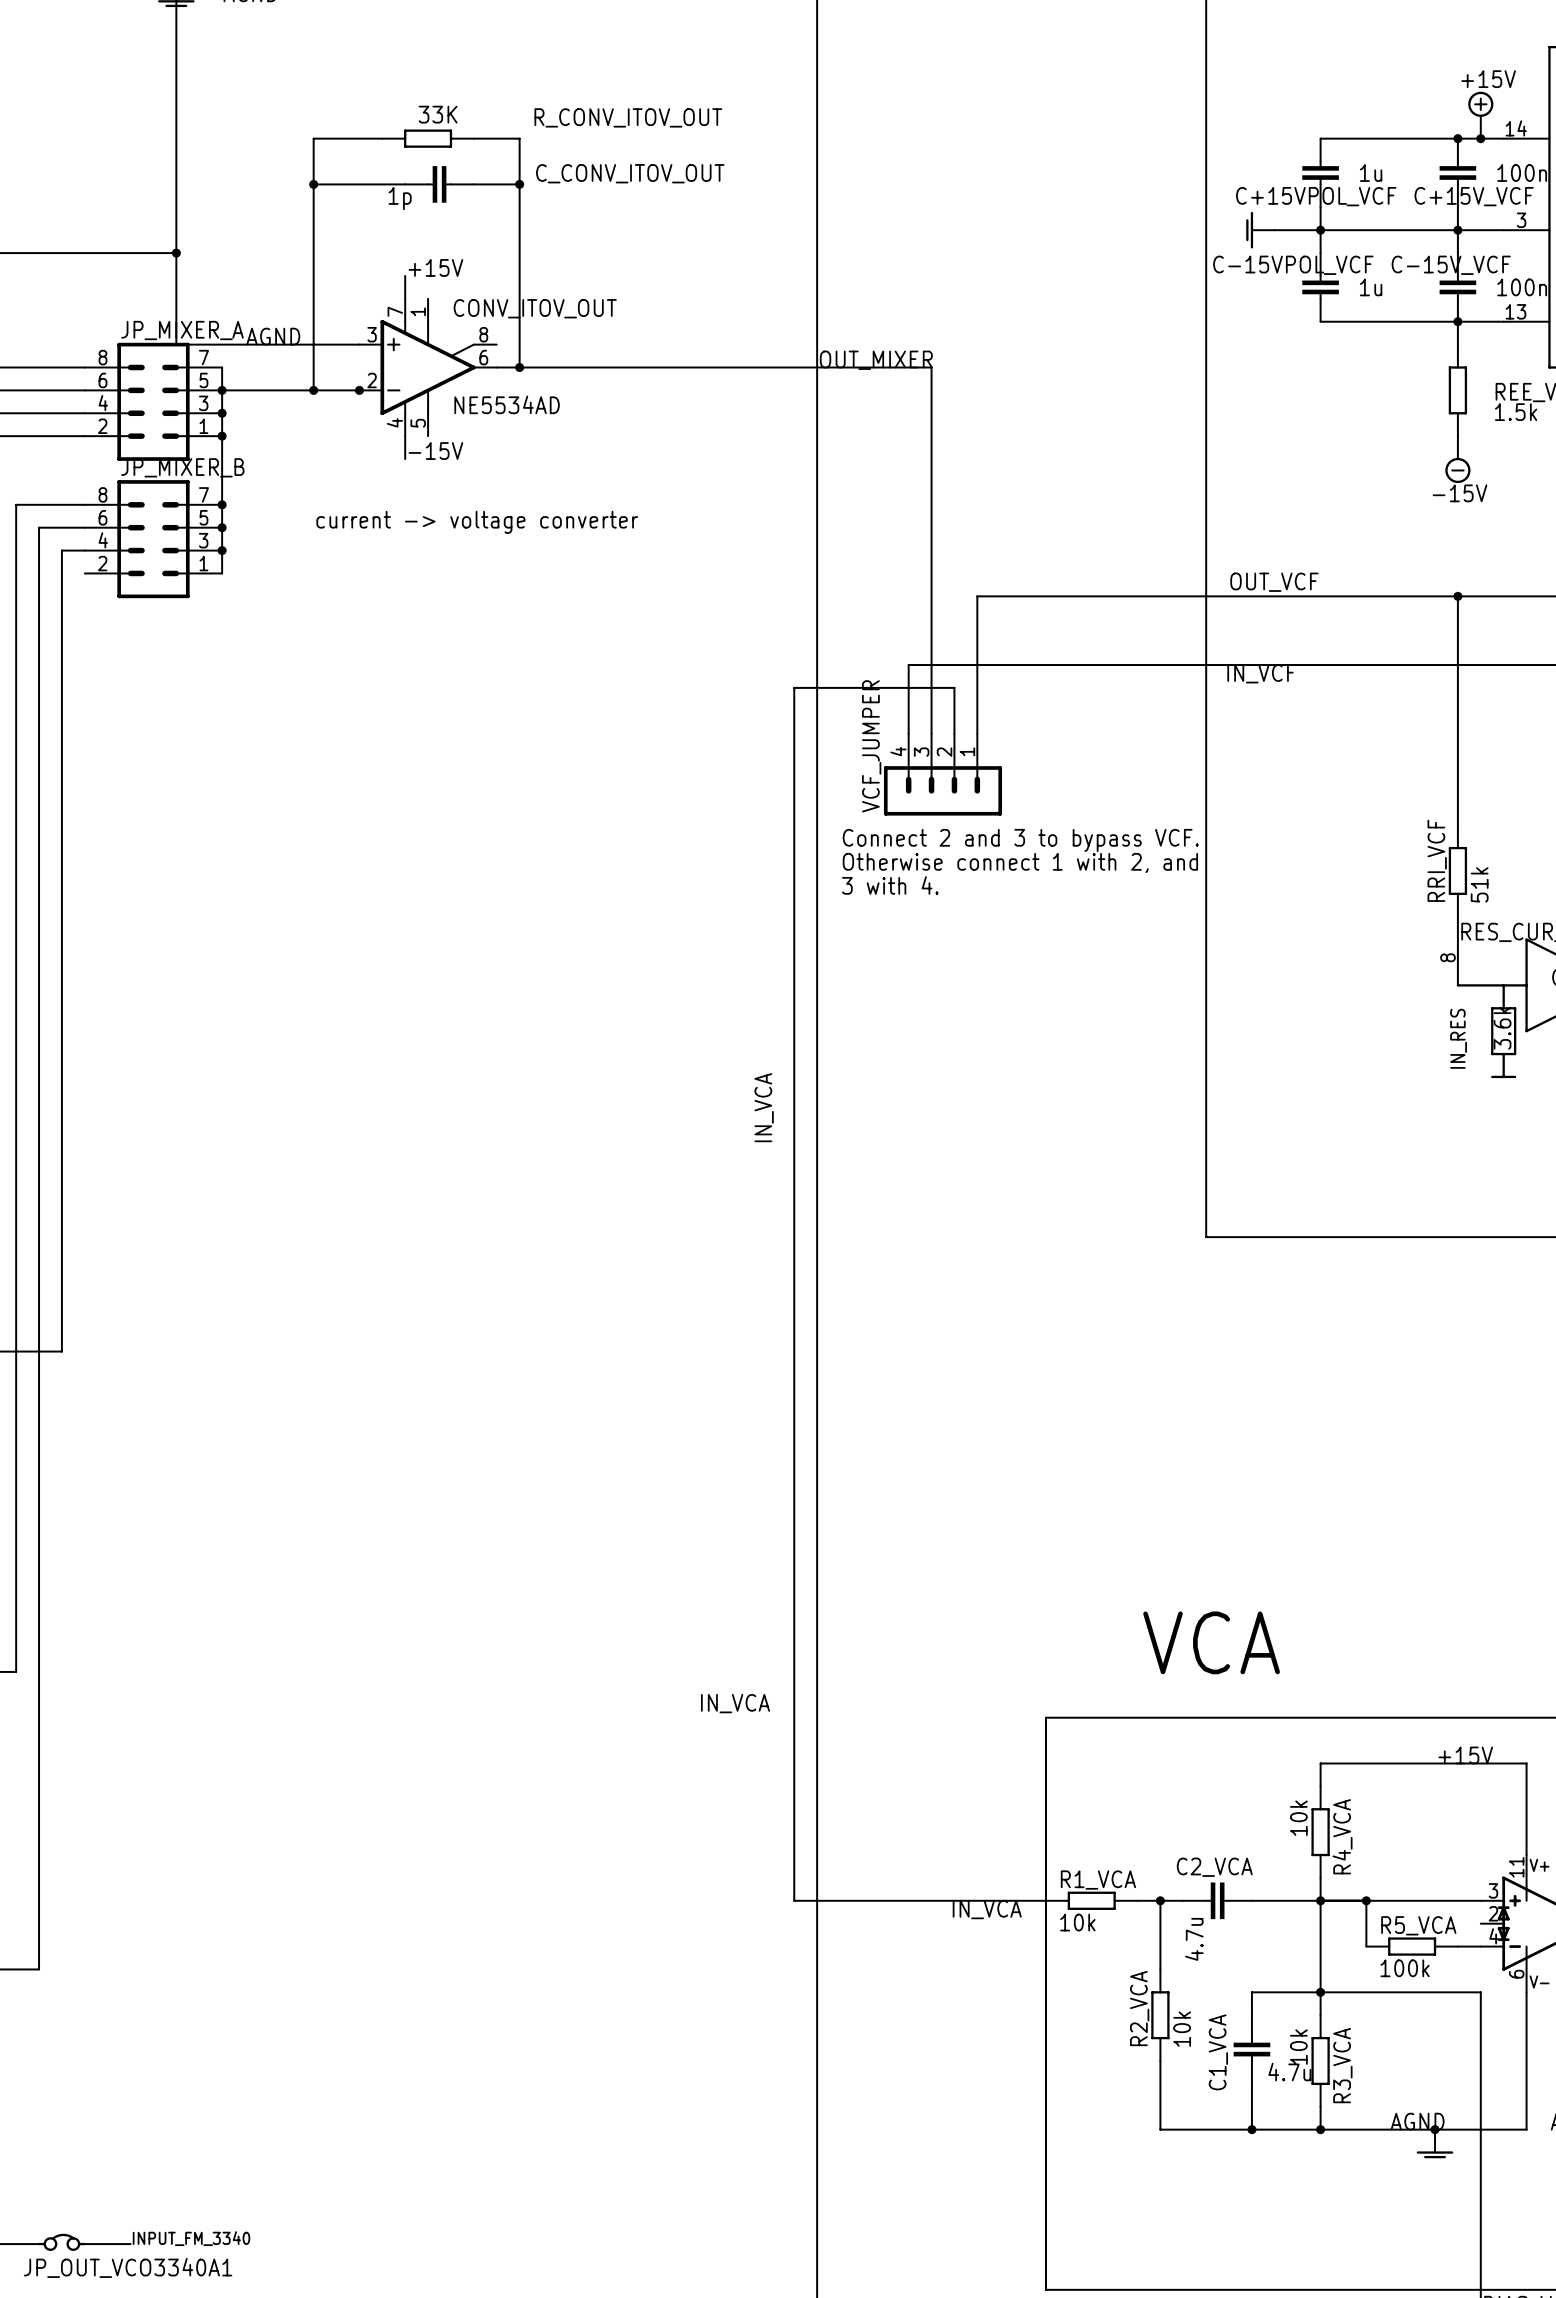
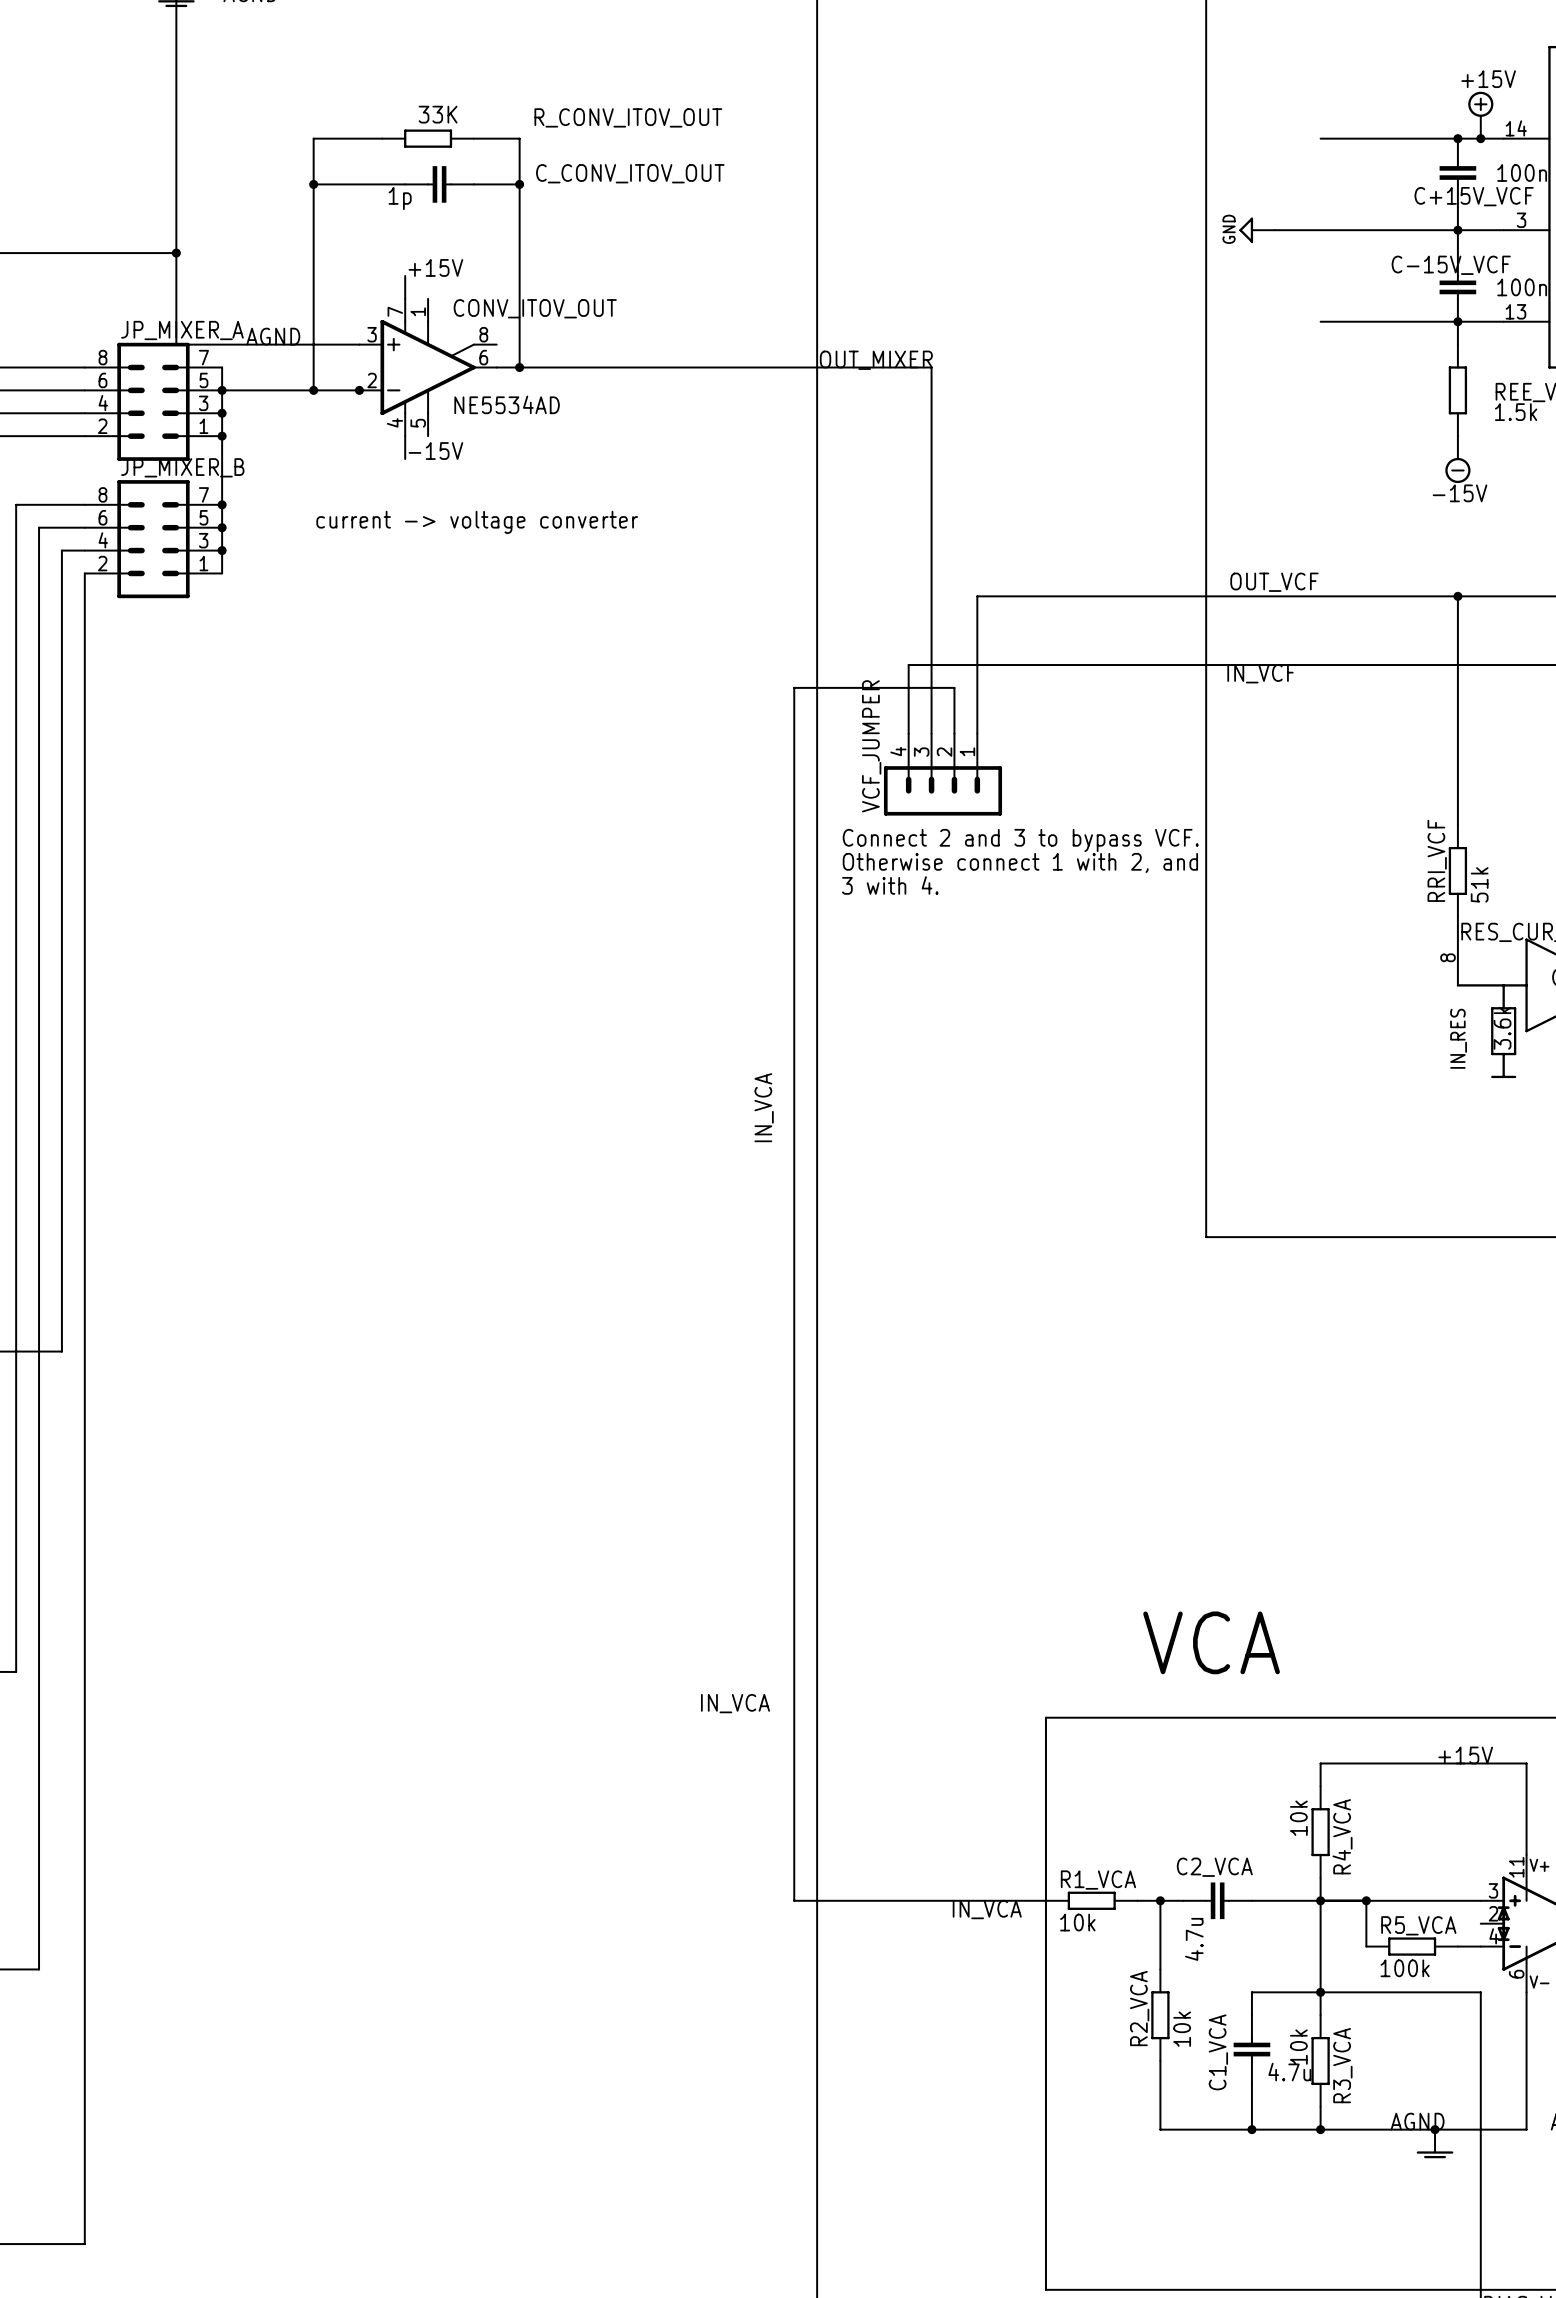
C+15VPOL_VCF: 1u (1320, 172) -> none
wire: (1320, 207) (1320, 253) -> none
power symbol shape: [1246, 211, 1275, 249] -> [1239, 217, 1275, 243]
power symbol text: none -> GND (1229, 229)
junction: (1320, 230) -> none
C-15VPOL_VCF: 1u (1320, 287) -> none
wire: none -> (84, 573) (84, 2244) (39, 2244)
label: INPUT_FM_3340 (191, 2238) -> none
JP_OUT_VCO3340A1: (61, 2242) -> none
wire: (84, 2244) (130, 2244) -> none

